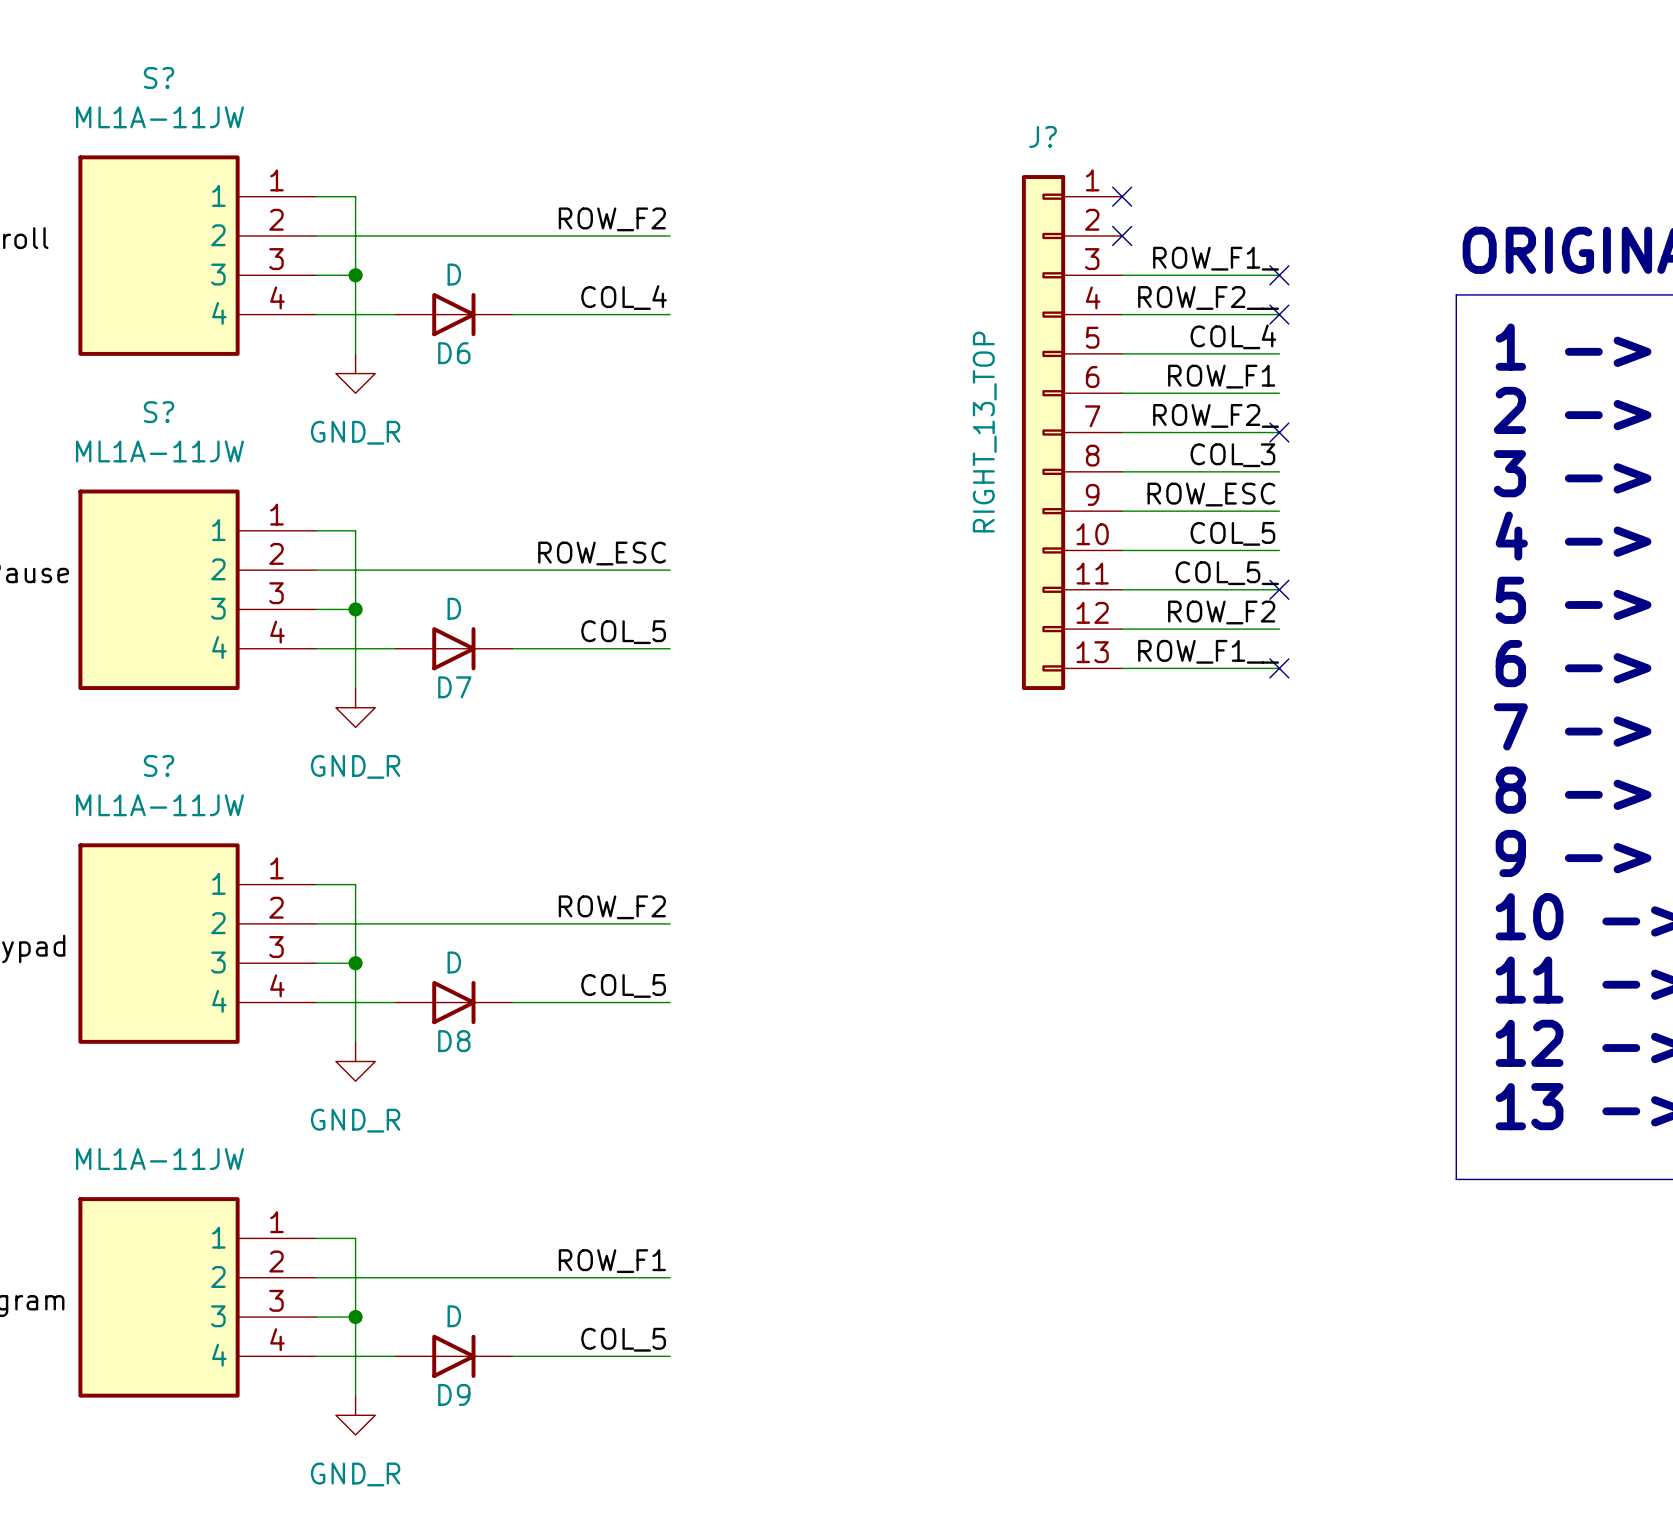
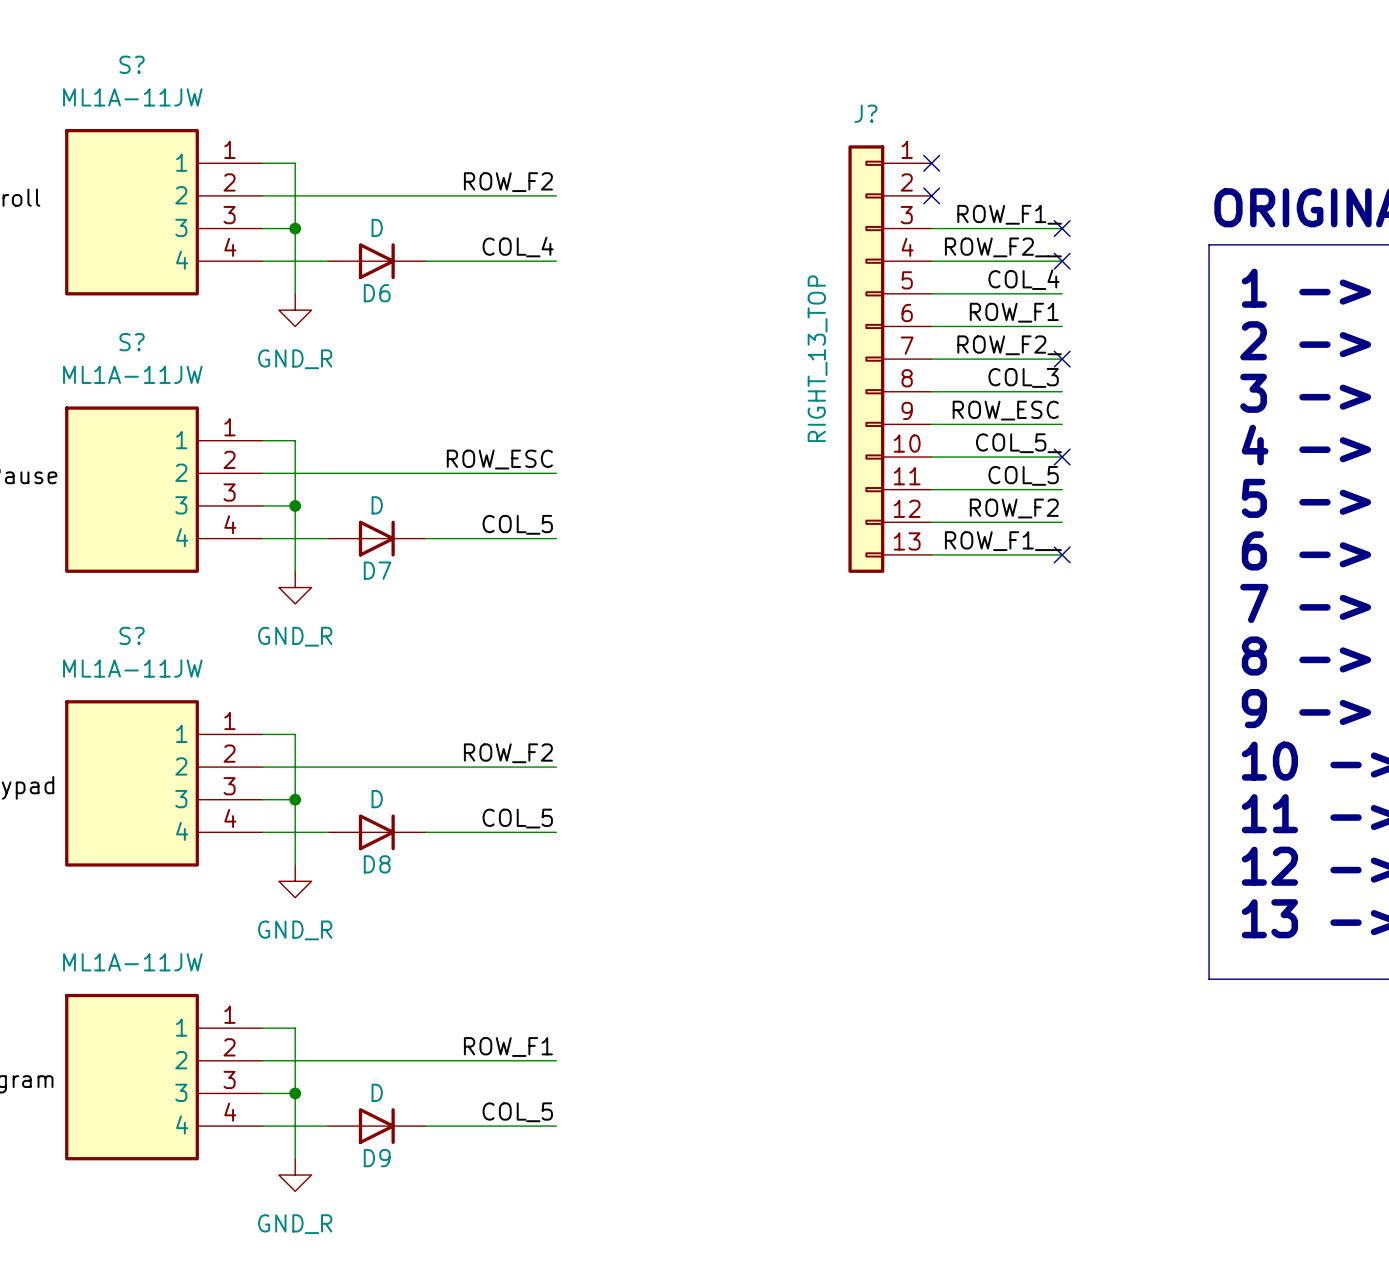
label: COL_5 (1232, 533) -> COL_5_ (1018, 443)
label: COL_5_ (1227, 573) -> COL_5 (1023, 475)
no-connect mark position: (1279, 589) -> (1062, 457)

